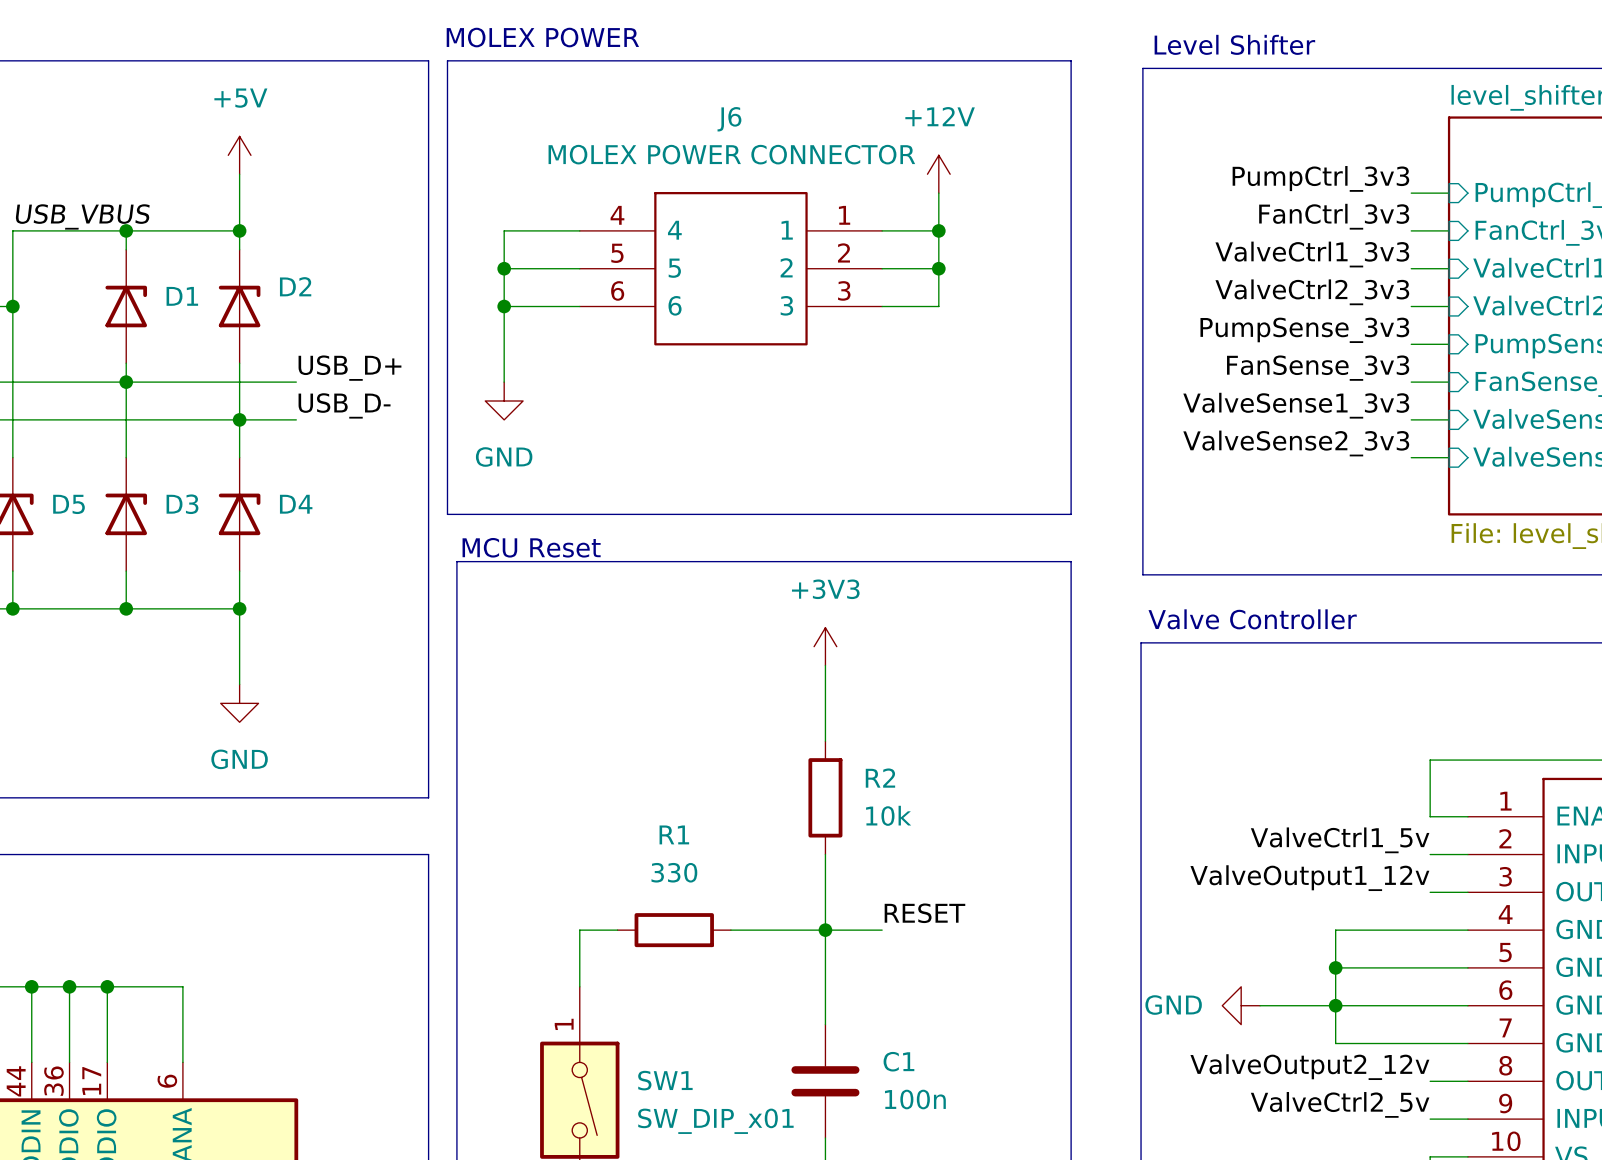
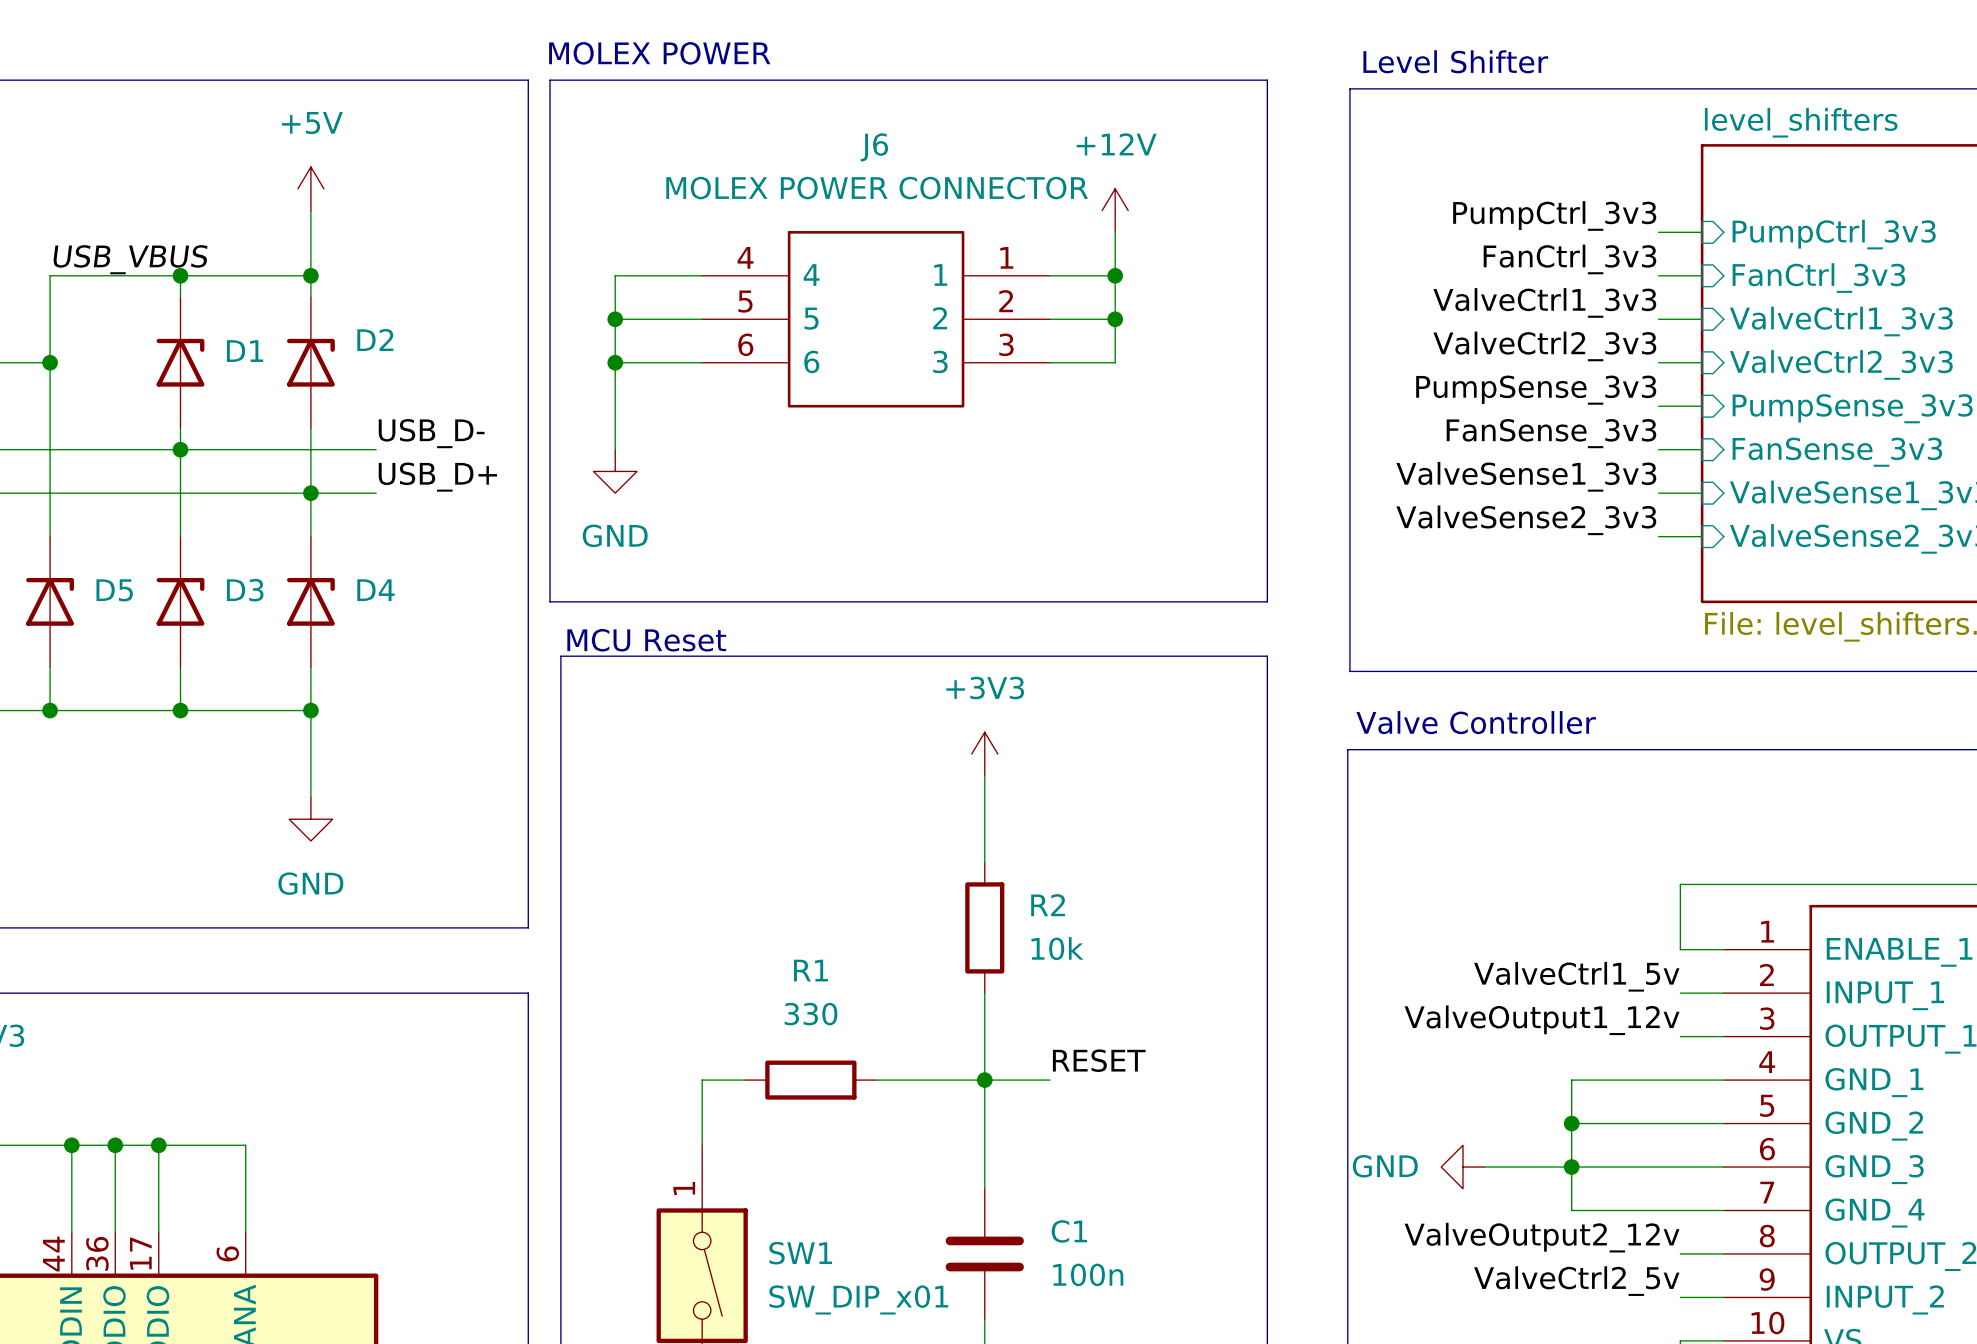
label: USB_D+ (349, 368) -> USB_D- (431, 433)
label: USB_D- (344, 405) -> USB_D+ (437, 477)

